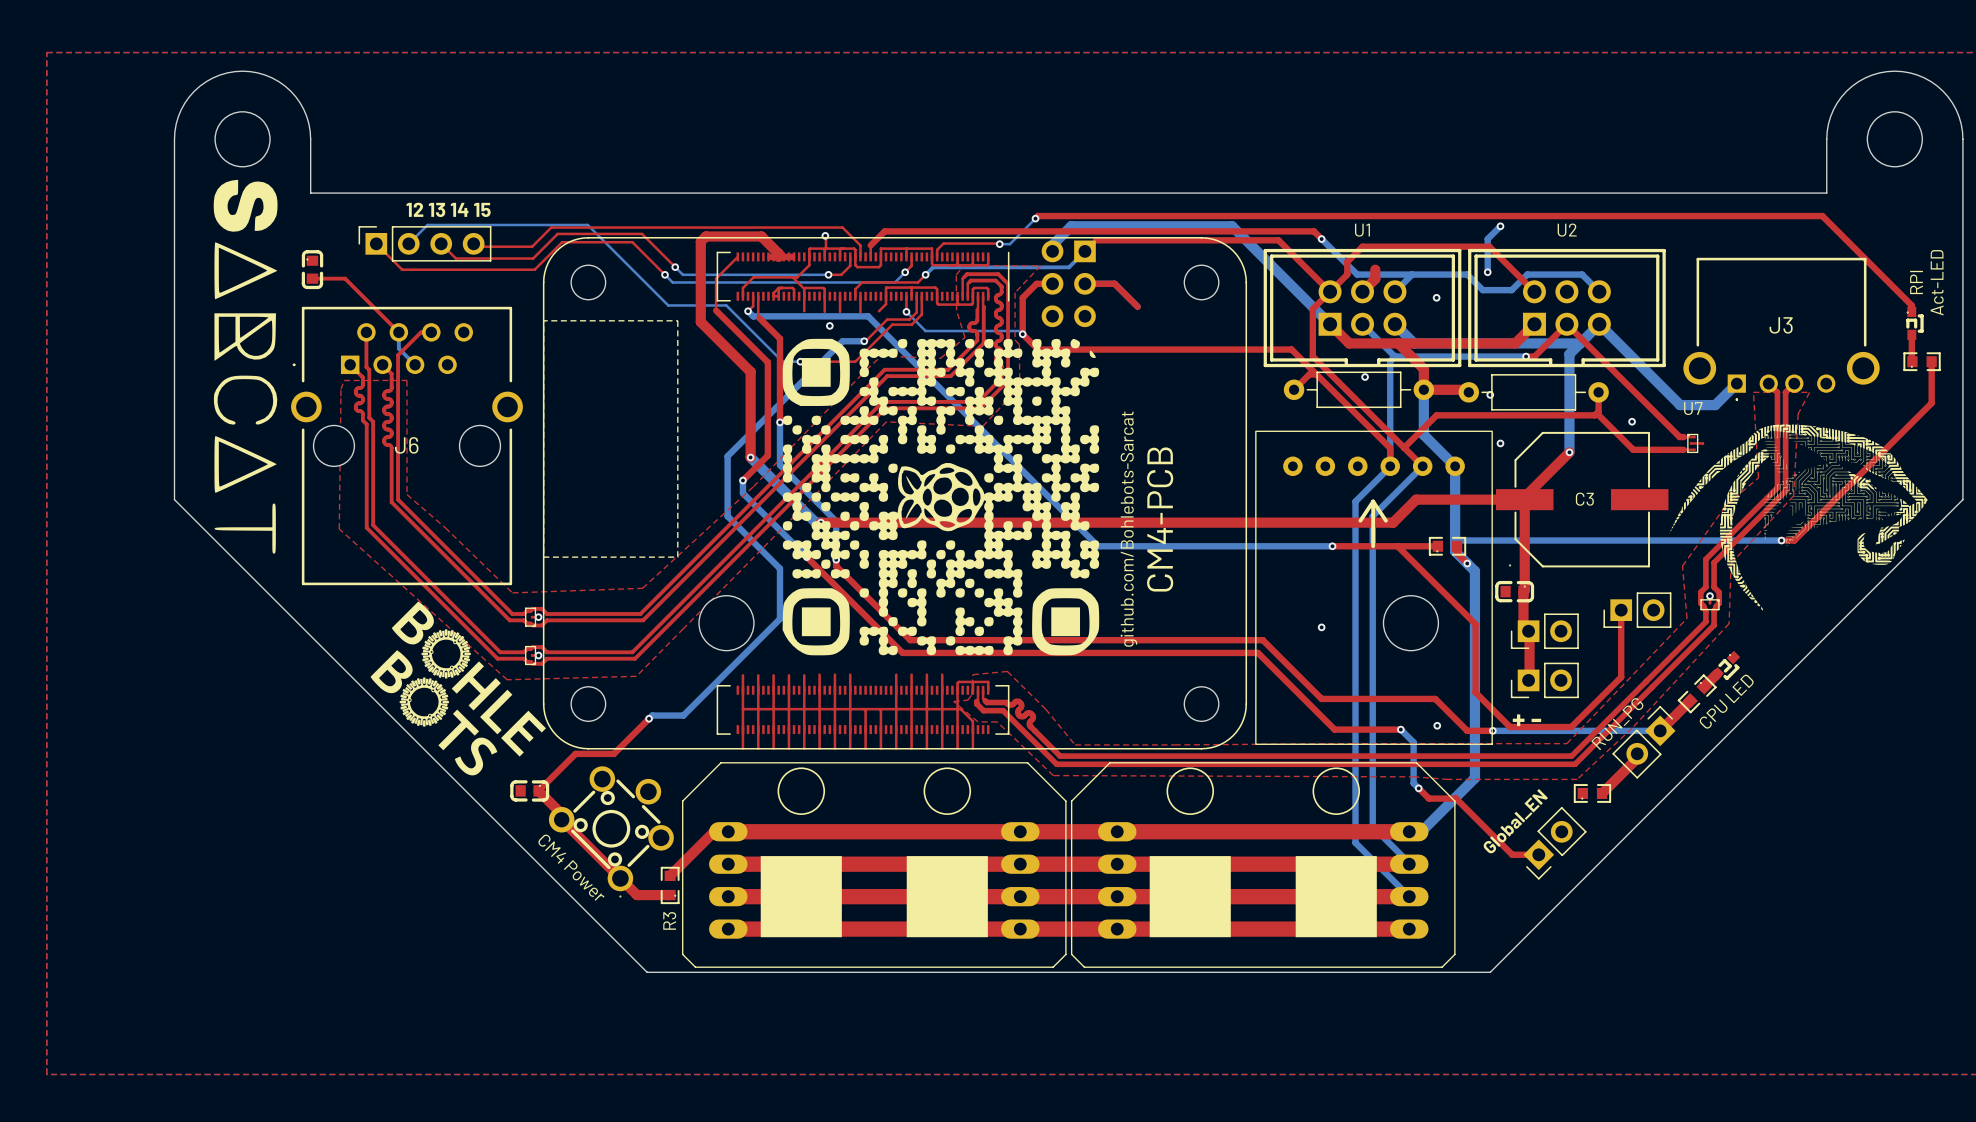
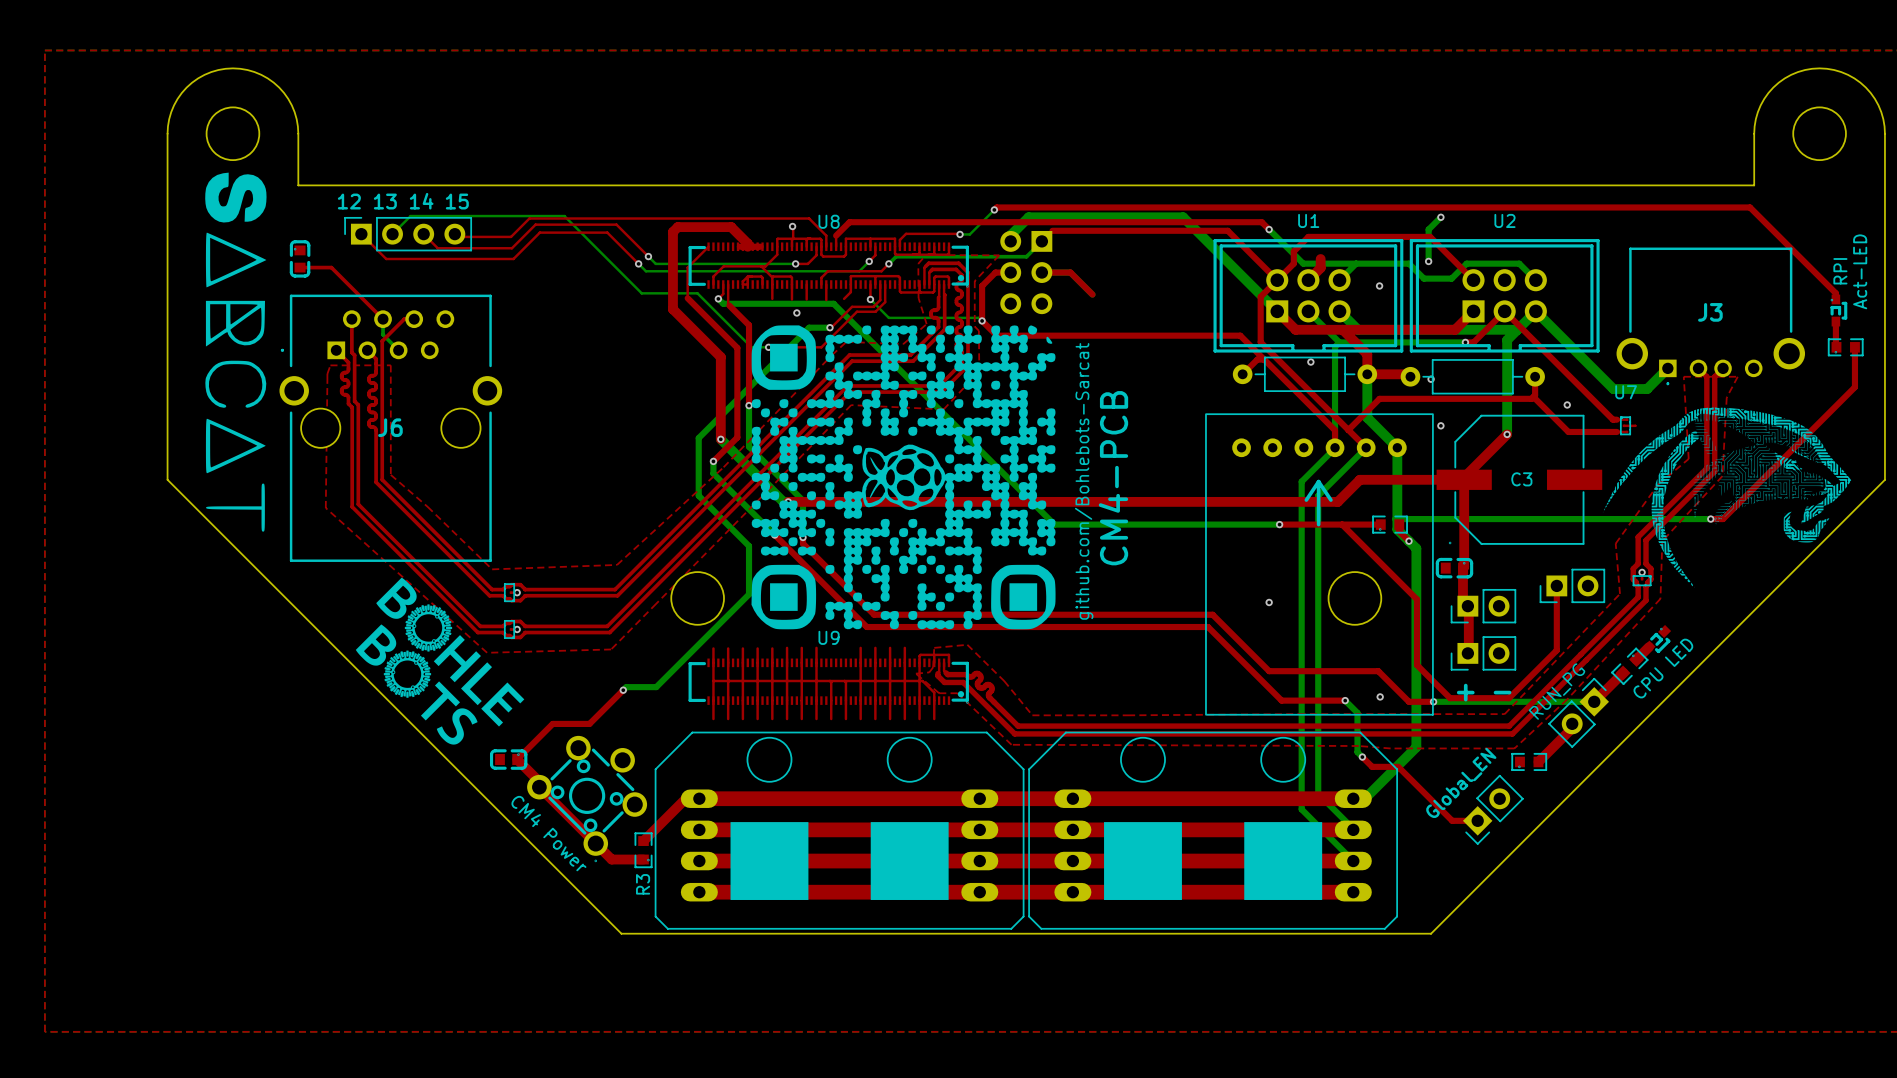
U8: none -> (828, 265)
part: (894, 493) -> none
U9: none -> (828, 681)

